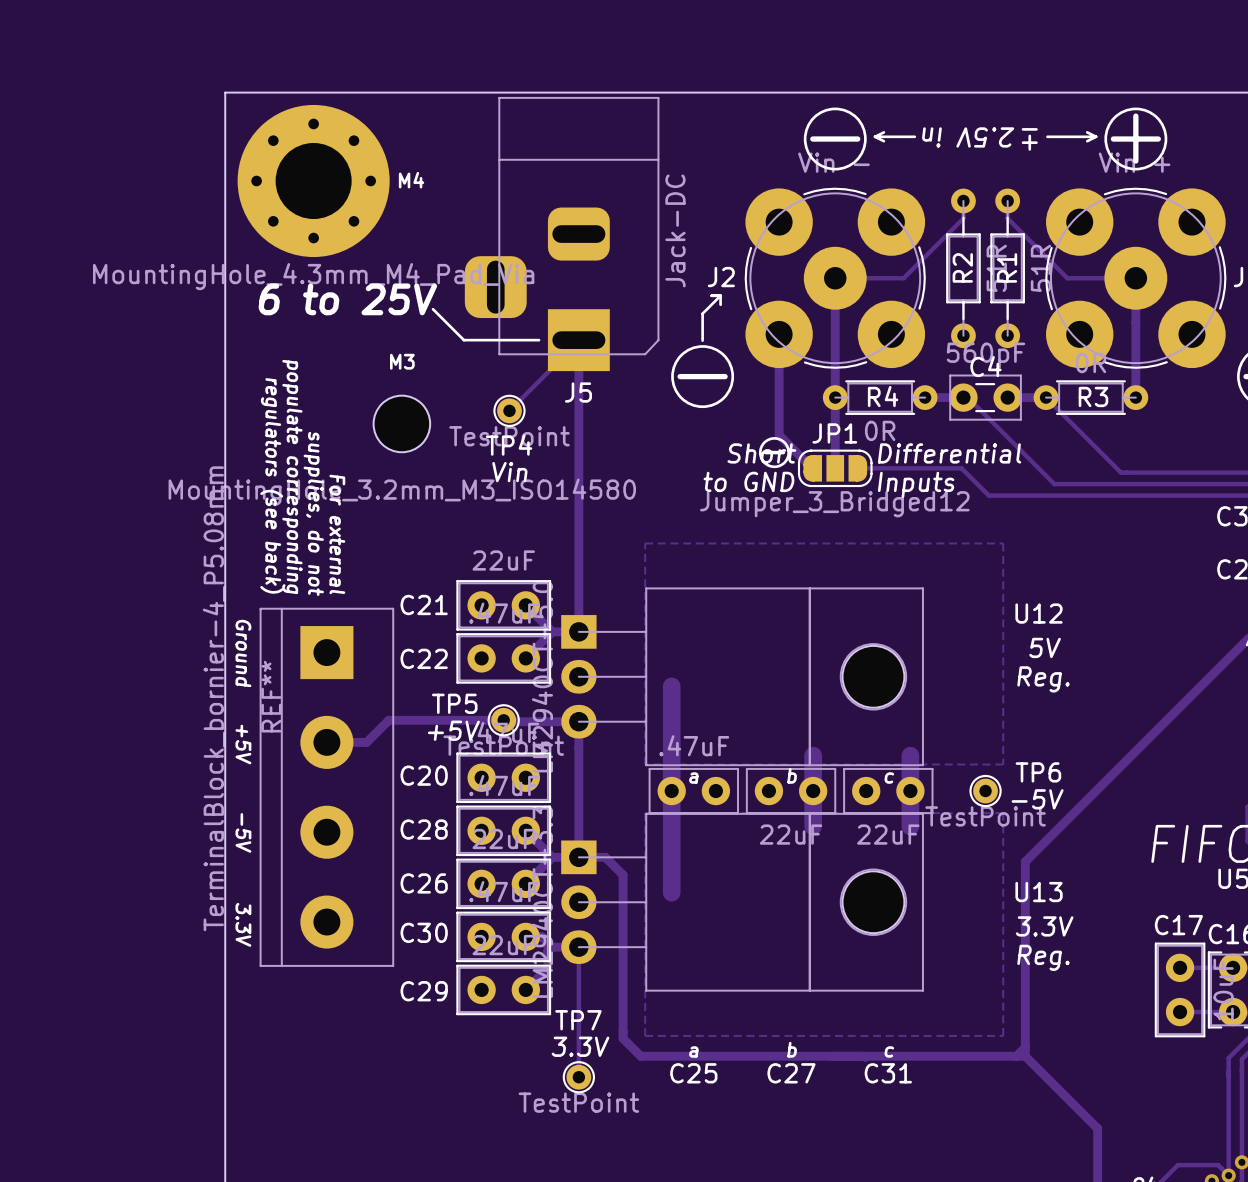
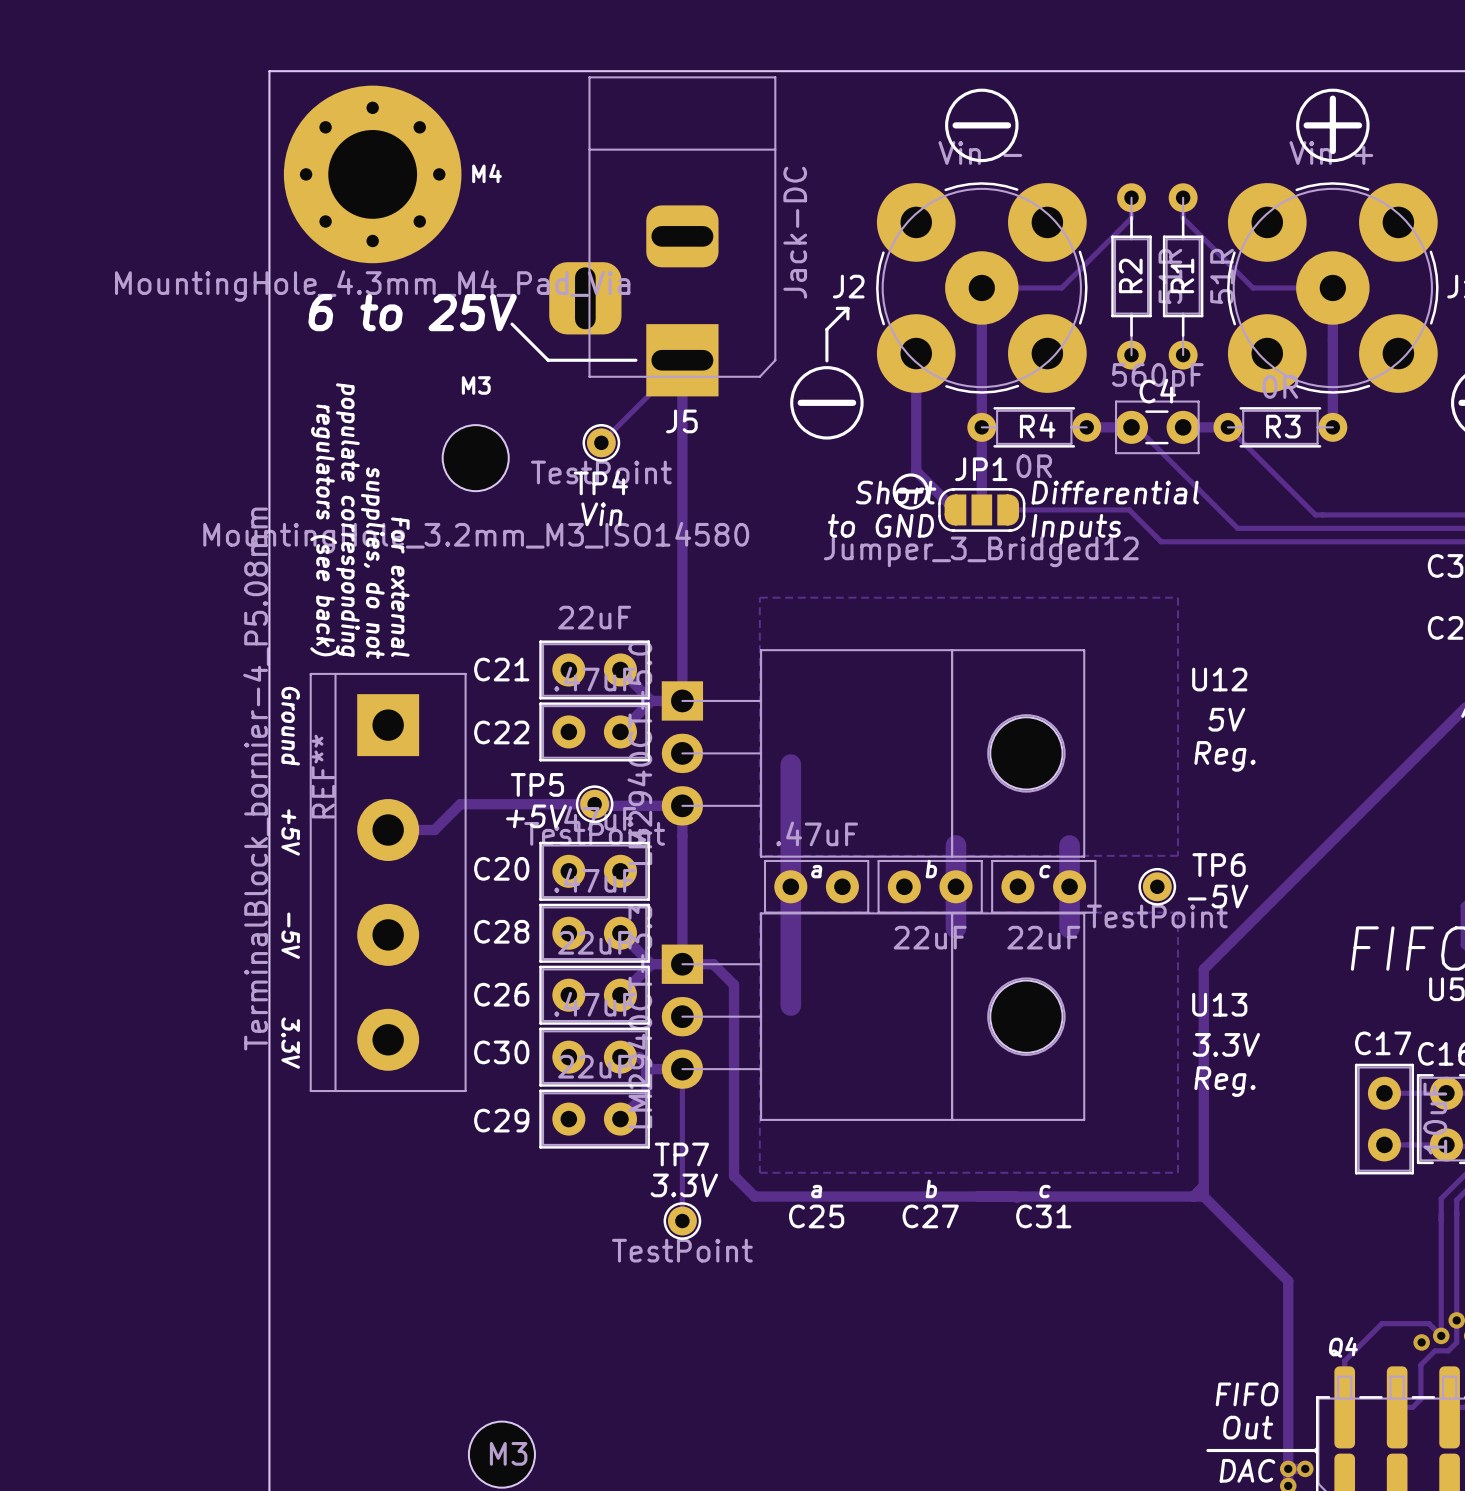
text: - (1029, 129) -> none
line: (883, 132) (875, 136) -> none
line: (1087, 132) (1096, 136) -> none
line: (875, 136) (883, 141) -> none
line: (875, 136) (914, 136) -> none
line: (1047, 136) (1096, 136) -> none
line: (1096, 136) (1087, 141) -> none
text: 2.5V in (968, 137) -> none
text: + (1029, 142) -> none

